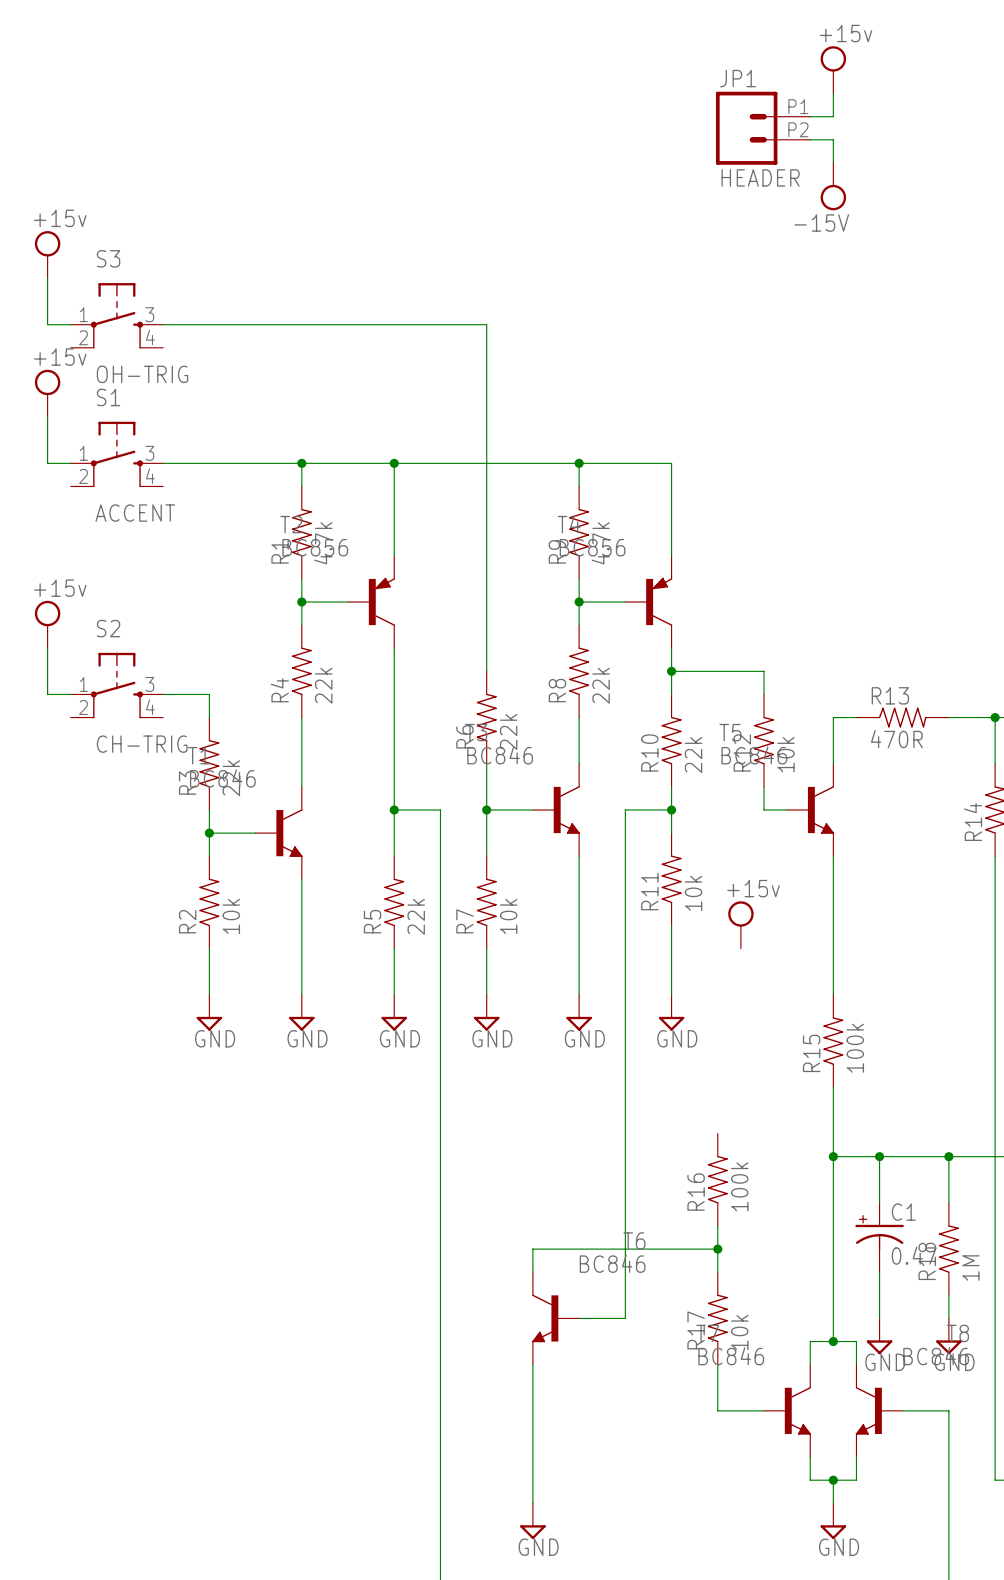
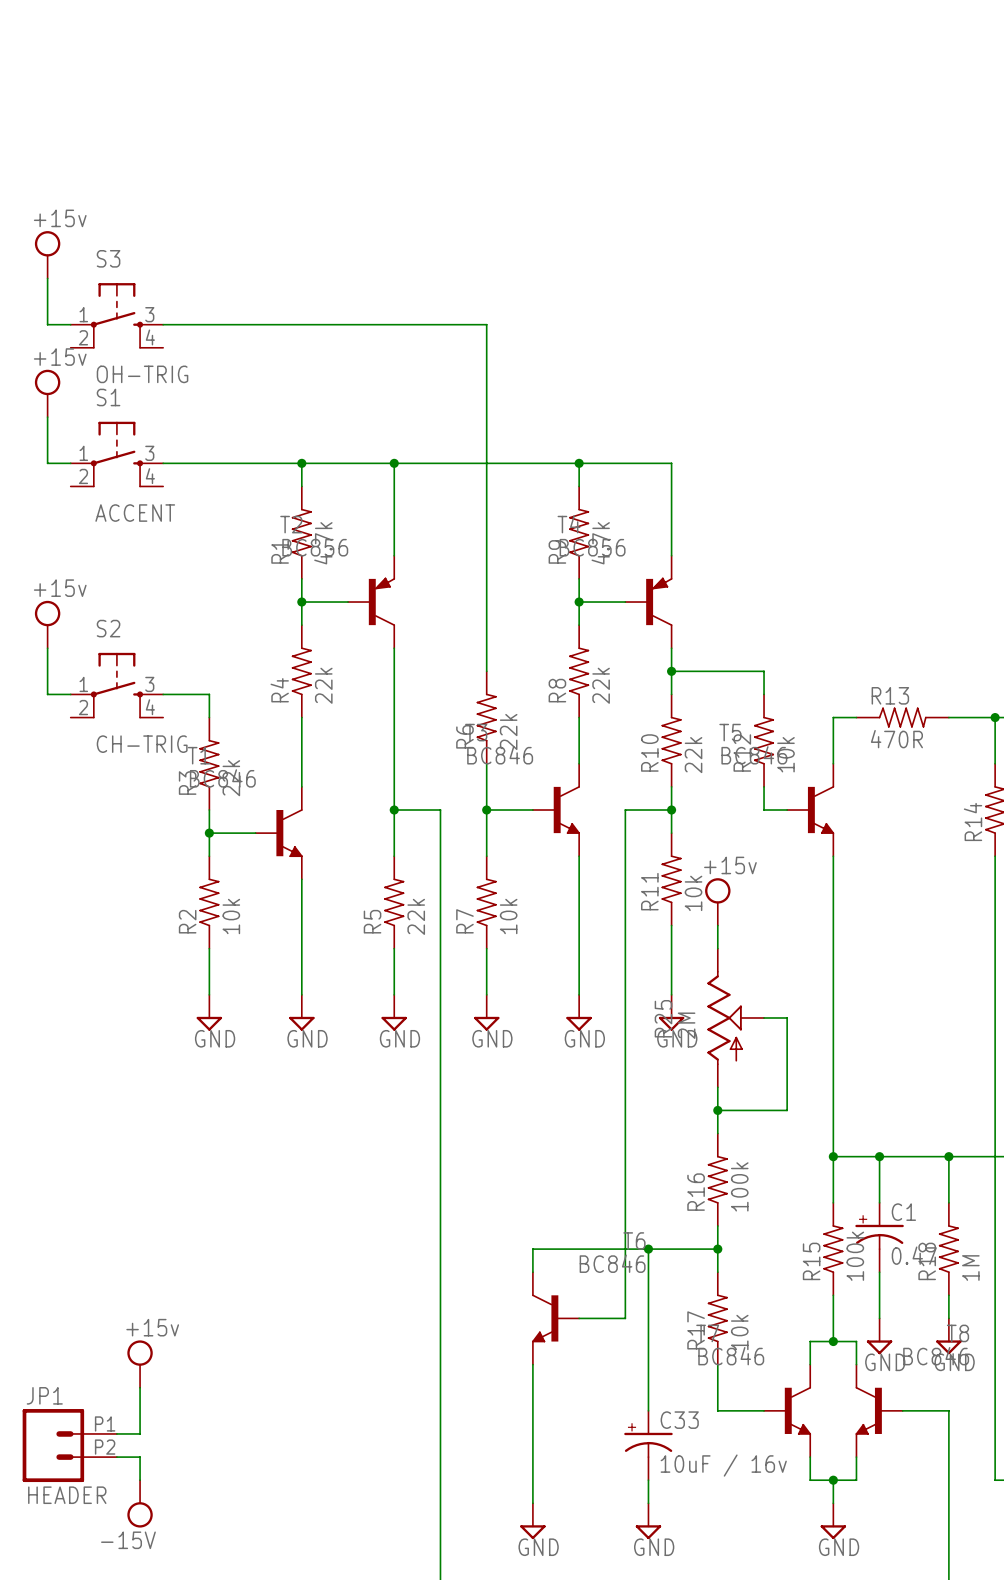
power symbol: +15v (833, 69) -> none
wire: (833, 93) (833, 116) (810, 116) -> none
JP1 position: (763, 128) -> (69, 1445)
wire: (810, 139) (833, 139) (833, 162) -> none
power symbol: -15V (833, 186) -> none
power symbol position: +15v (740, 924) -> +15v (717, 901)
wire: none -> (717, 925) (717, 948)
R25: none -> 2M (735, 1017)
wire: none -> (764, 1017) (787, 1017) (787, 1110) (717, 1110)
R15 position: (833, 1041) -> (833, 1249)
wire: none -> (717, 1087) (717, 1133)
junction: none -> (717, 1110)
wire: none -> (648, 1249) (648, 1410)
junction: none -> (648, 1249)
power symbol: none -> +15v (140, 1364)
wire: none -> (140, 1387) (140, 1433) (116, 1433)
C33: none -> 10uF / 16v (648, 1445)
wire: none -> (116, 1457) (140, 1457) (140, 1480)
wire: none -> (648, 1480) (648, 1503)
power symbol: none -> -15V (140, 1503)
power symbol: none -> GND (648, 1521)

